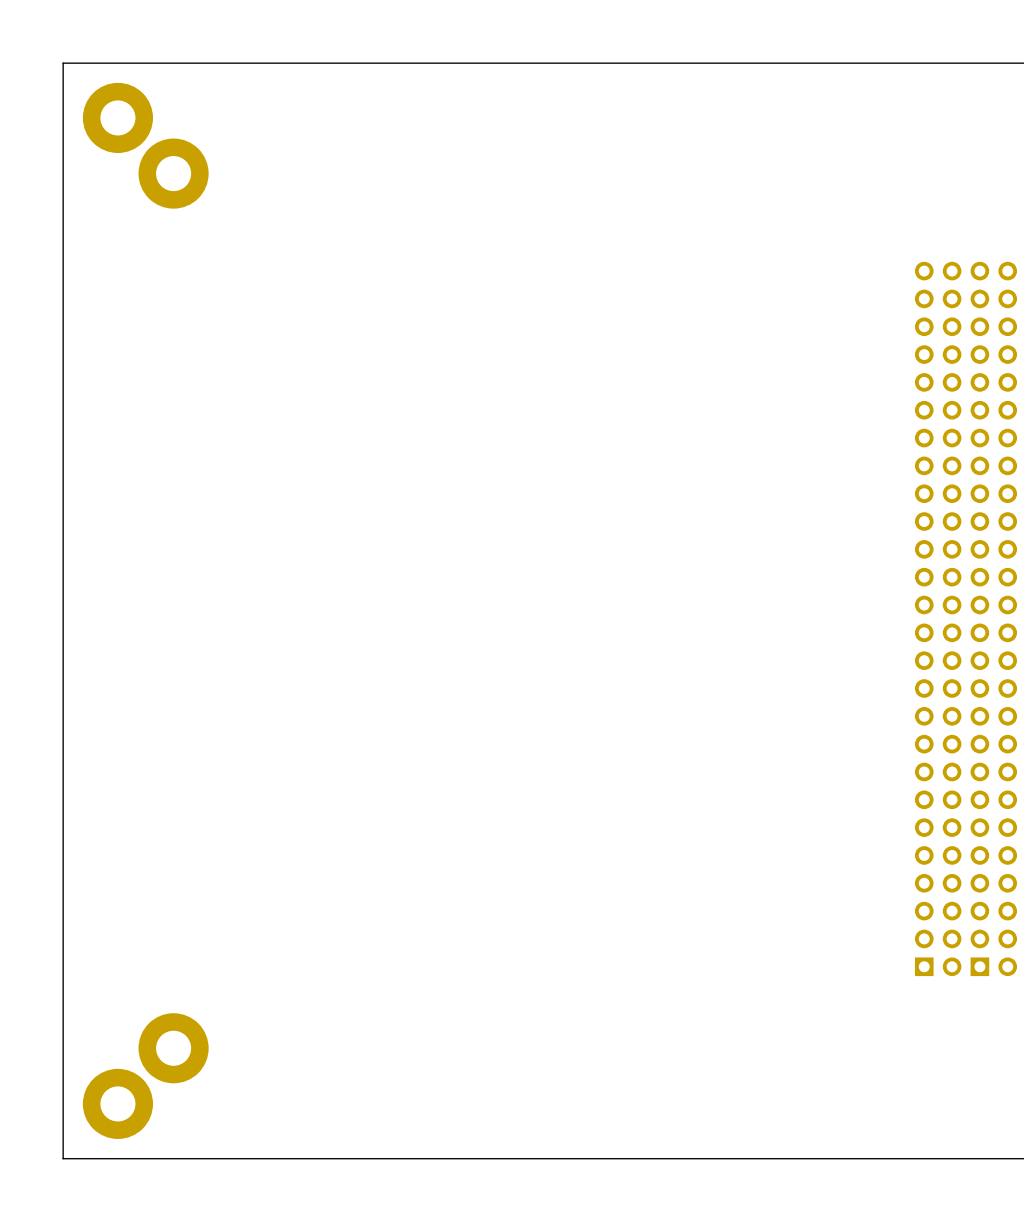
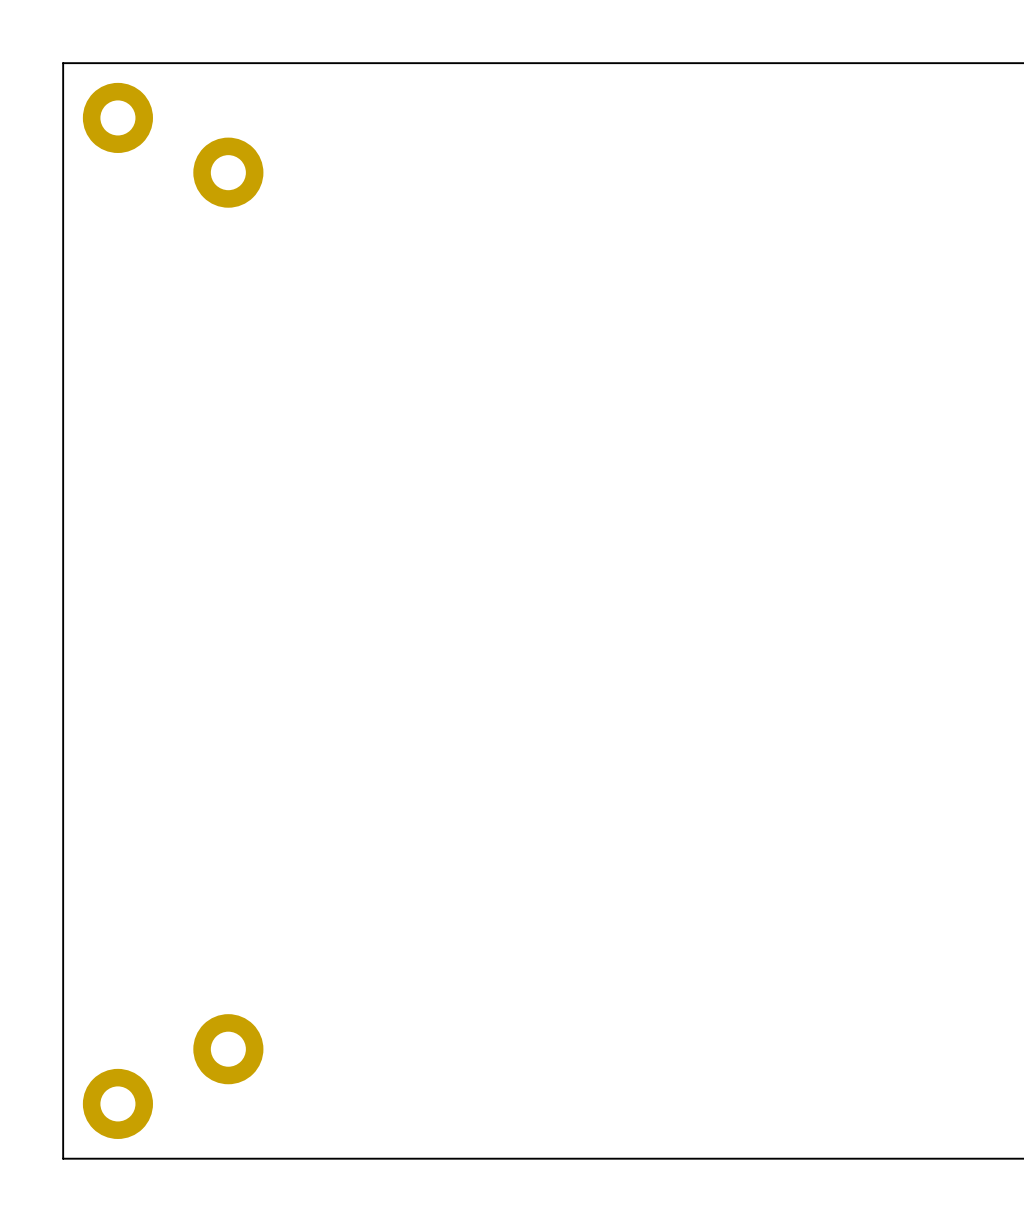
part position: (173, 173) -> (228, 172)
part: (938, 618) -> none
part: (993, 618) -> none
part position: (173, 1048) -> (228, 1049)

